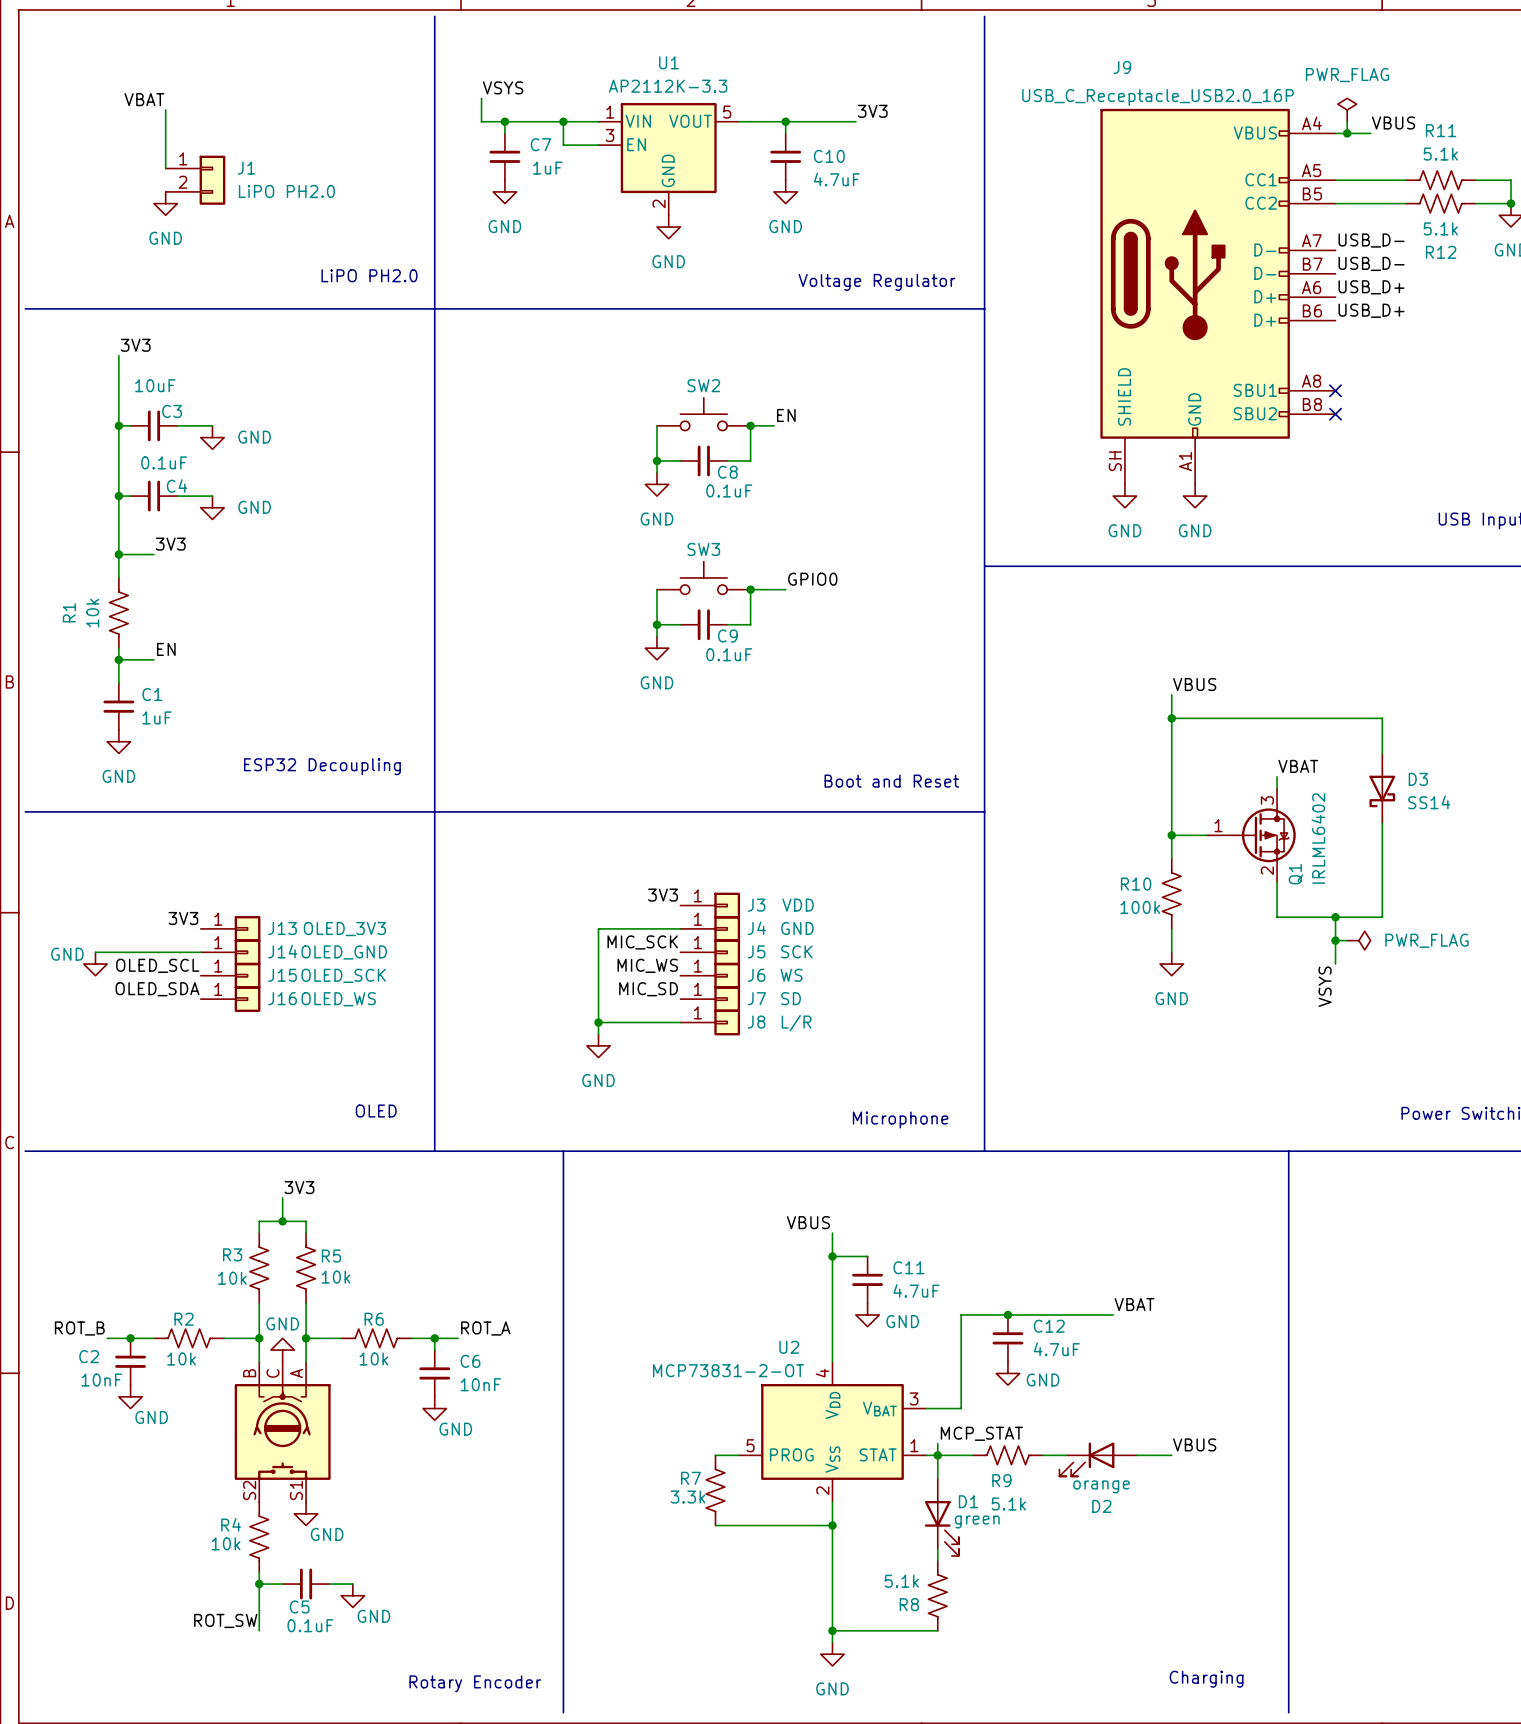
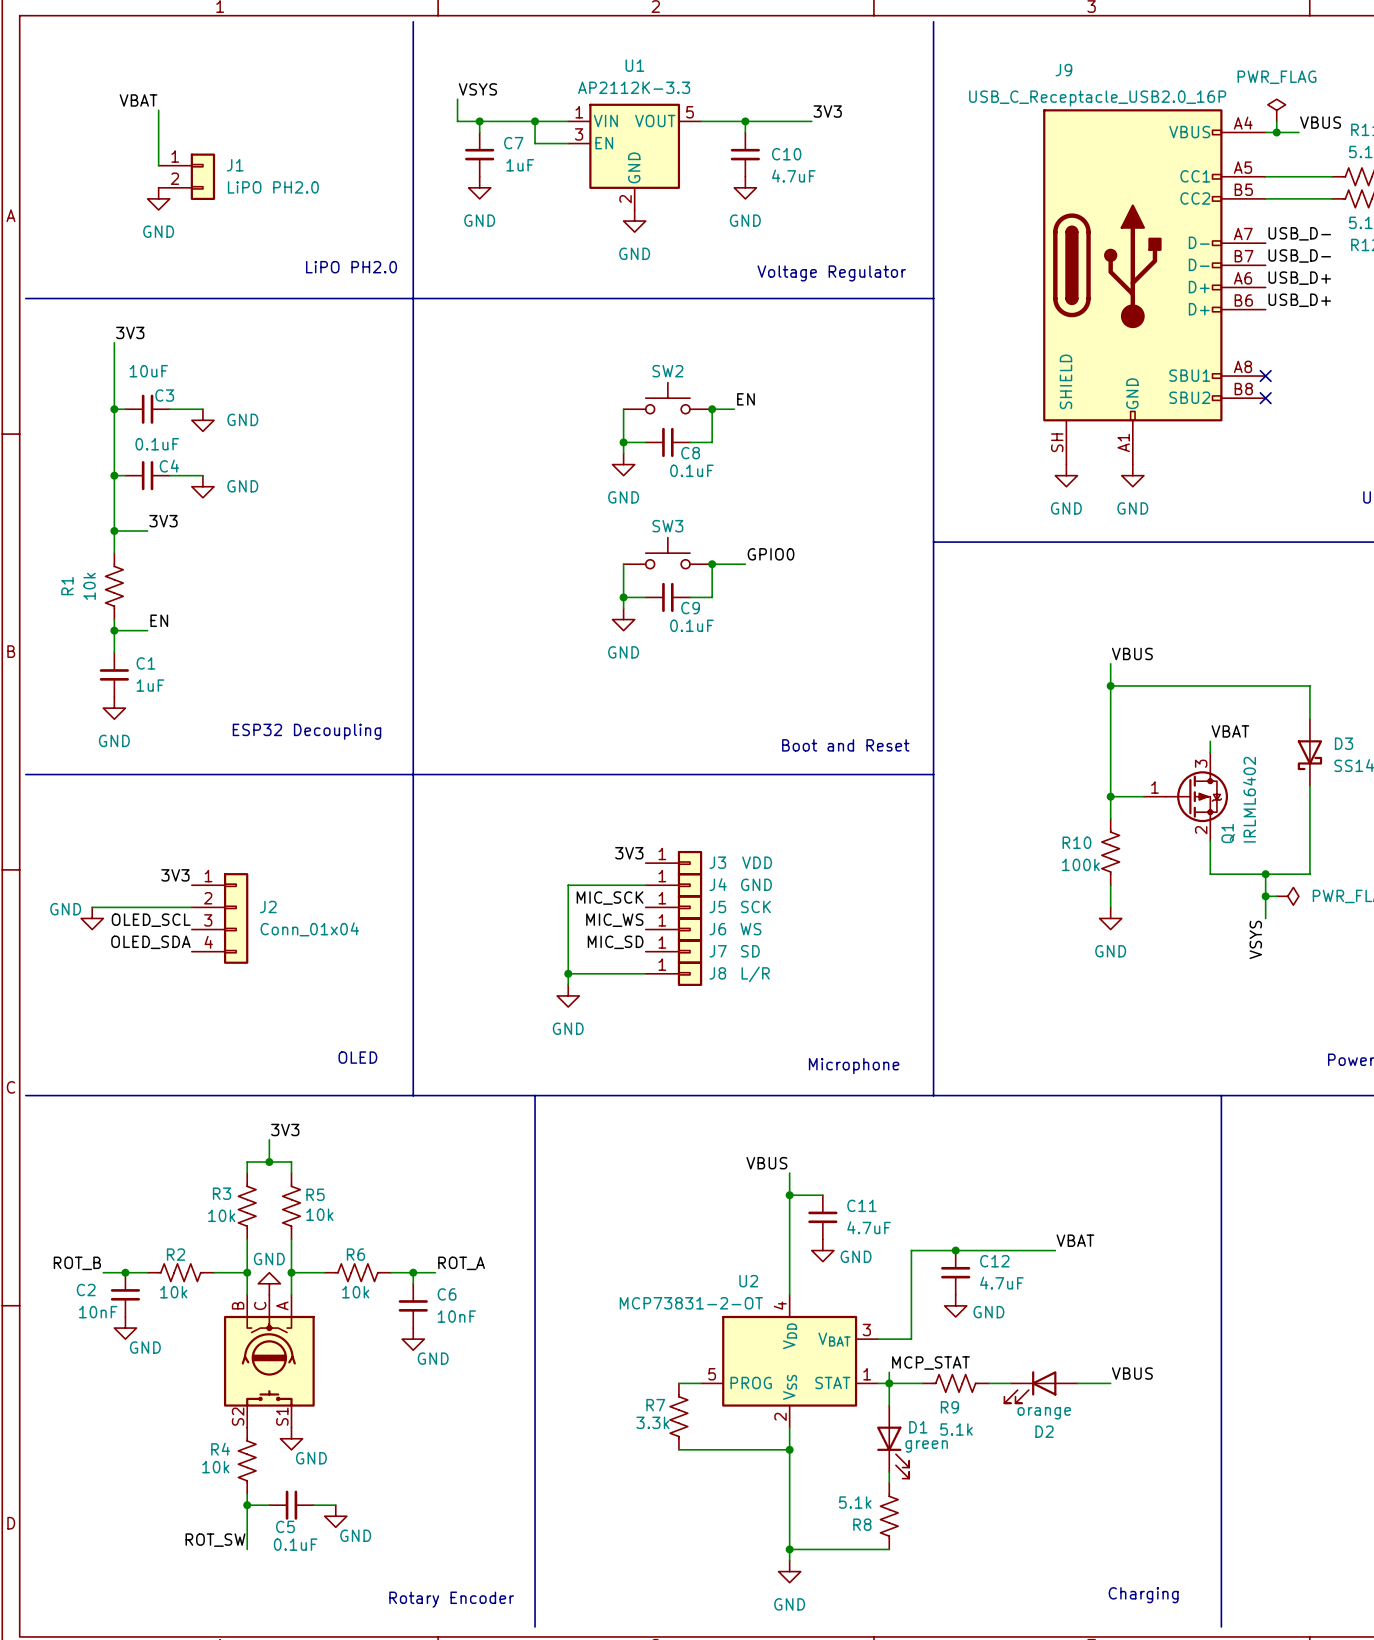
J13: OLED_3V3 (230, 928) -> none
J14: OLED_GND (230, 952) -> none
J2: none -> Conn_01x04 (220, 918)
J15: OLED_SCK (230, 975) -> none
J16: OLED_WS (230, 999) -> none

